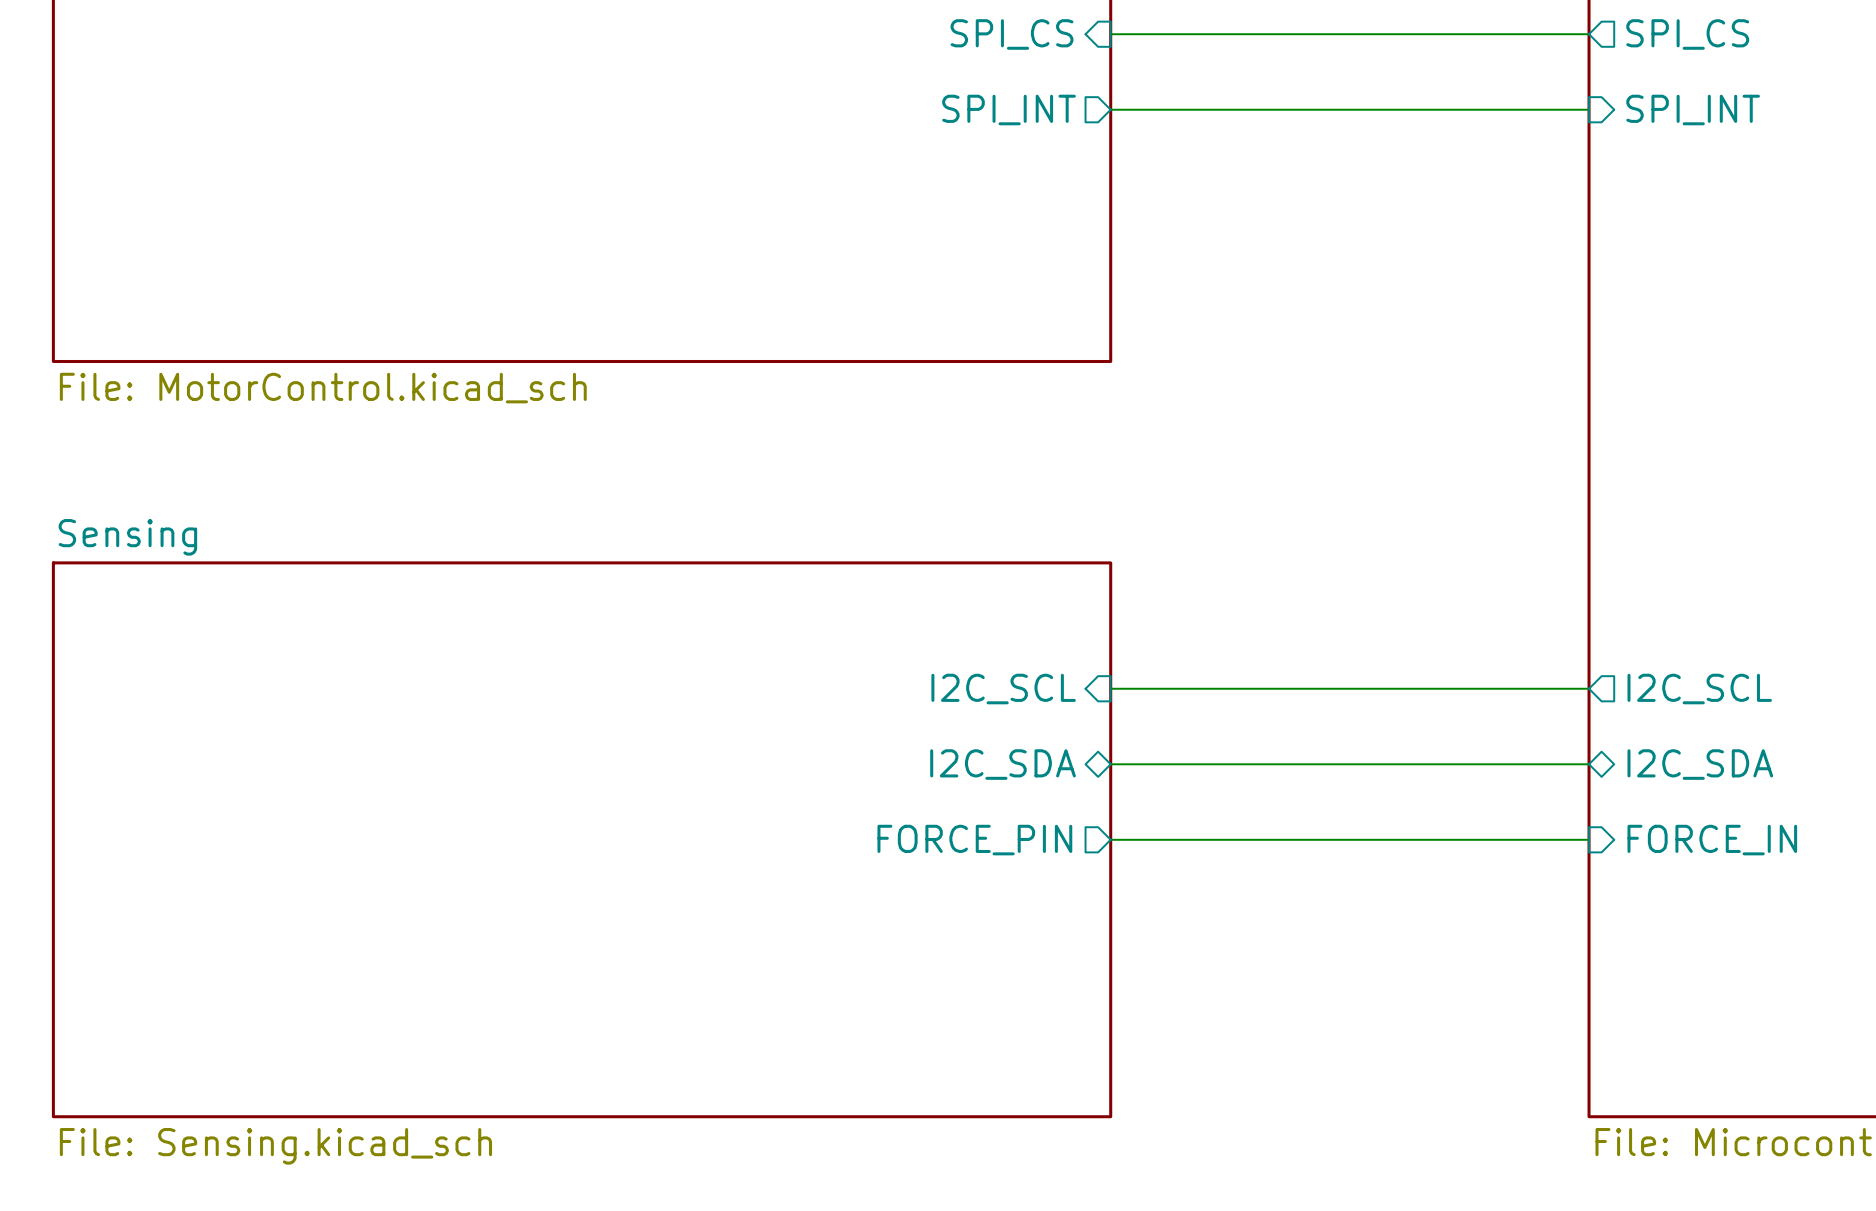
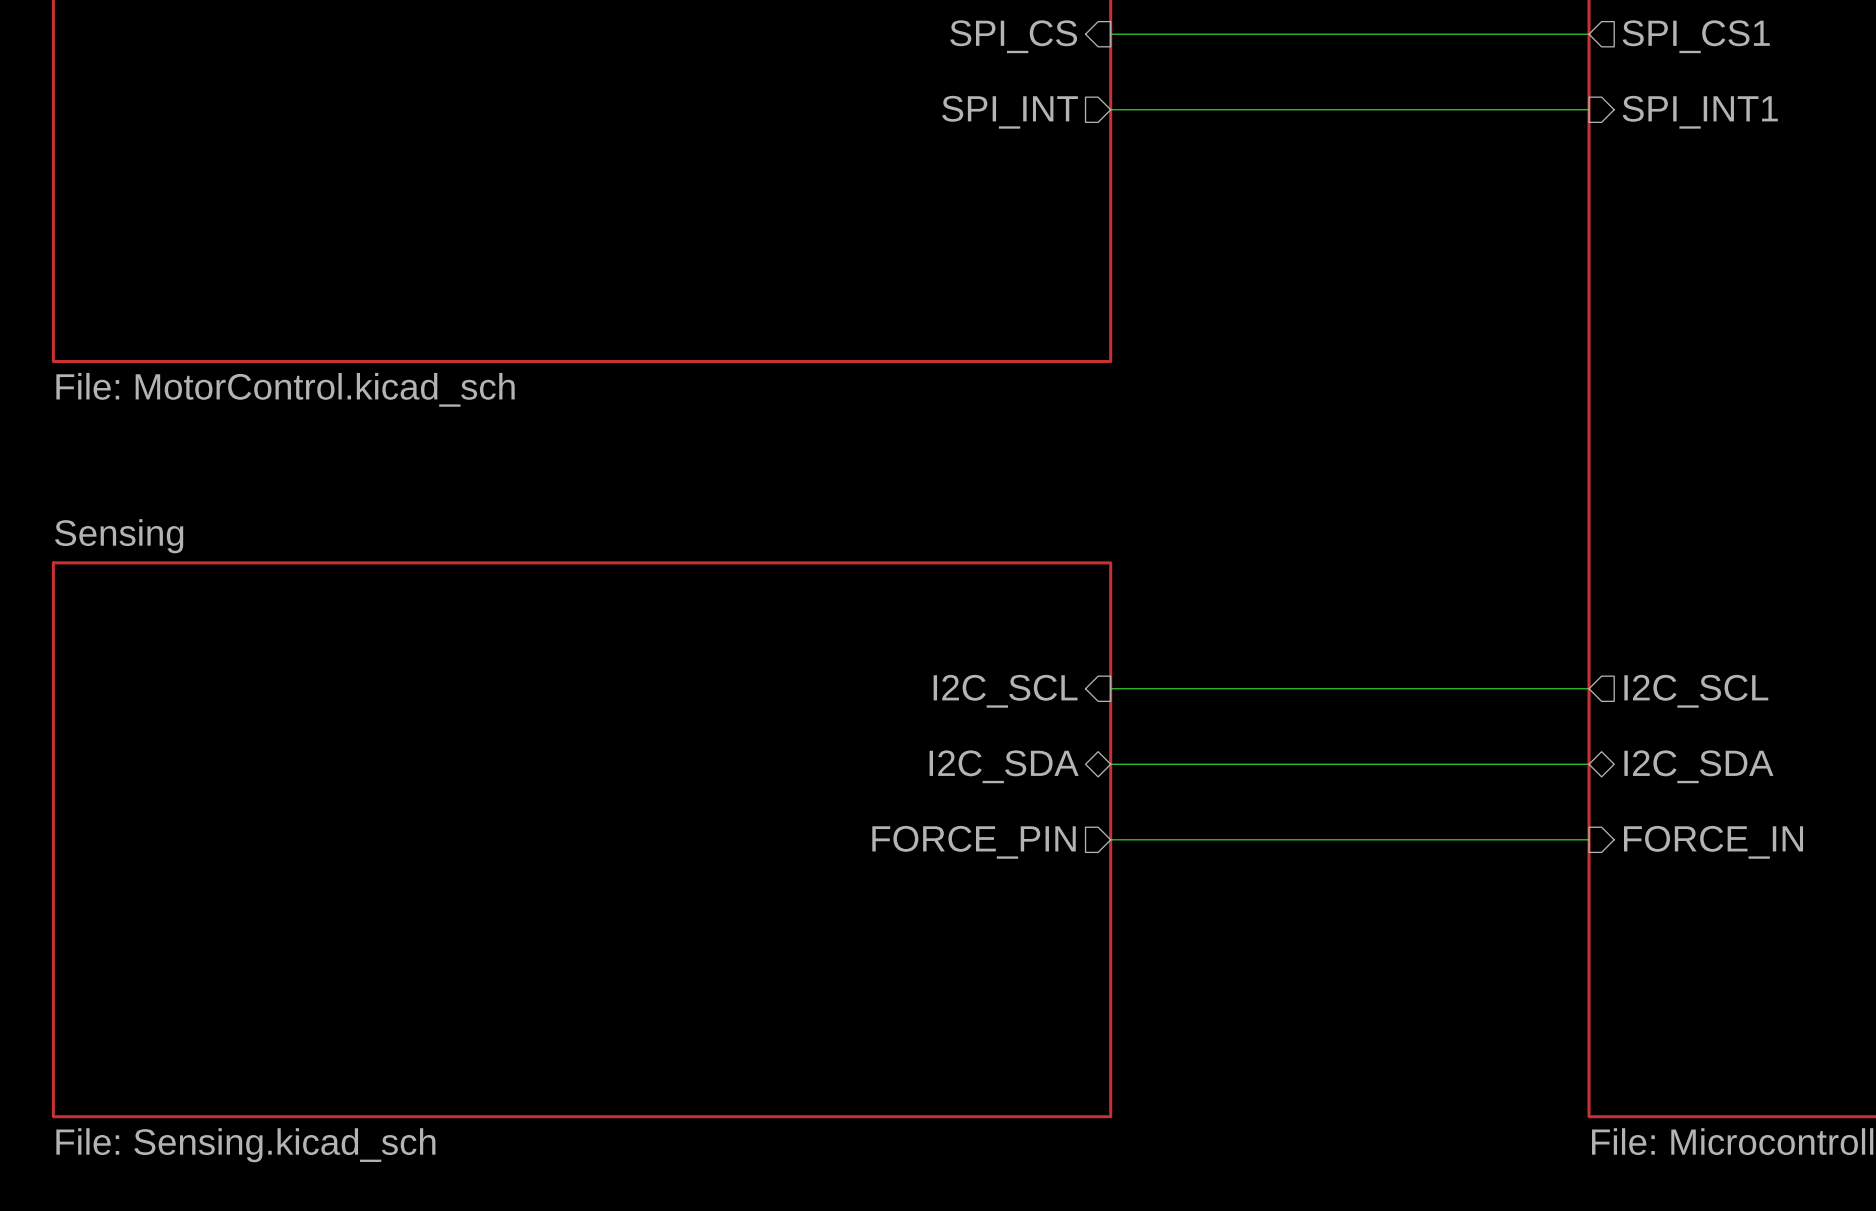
sheet pin: SPI_CS (1687, 34) -> SPI_CS1 (1696, 36)
sheet pin: SPI_INT (1693, 110) -> SPI_INT1 (1700, 112)

